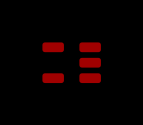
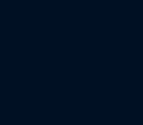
part: (71, 62) -> none

